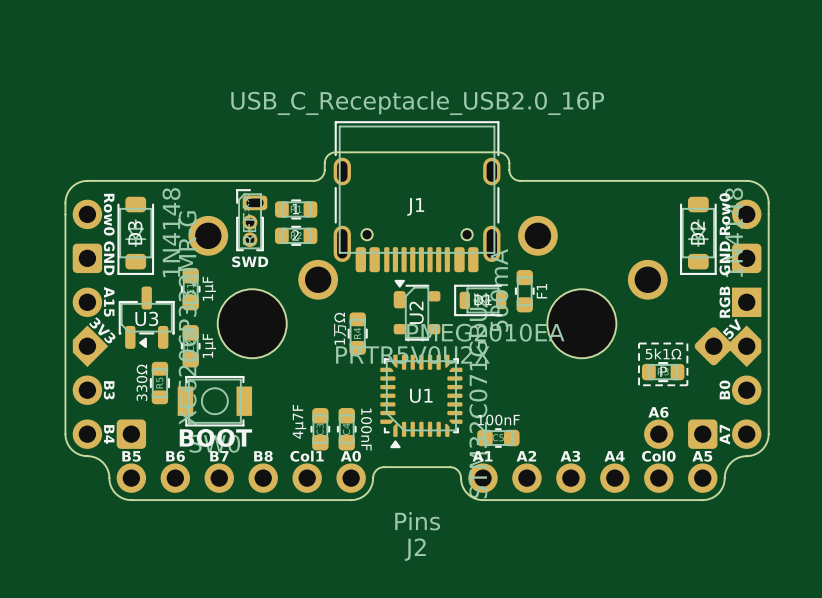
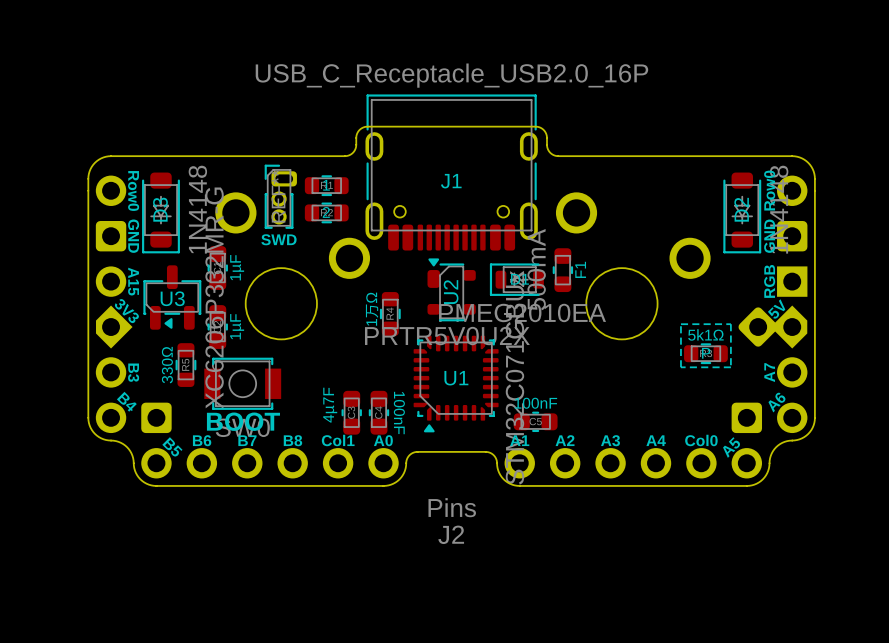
J2 footprint: [65, 199, 770, 501] -> [87, 175, 816, 487]

